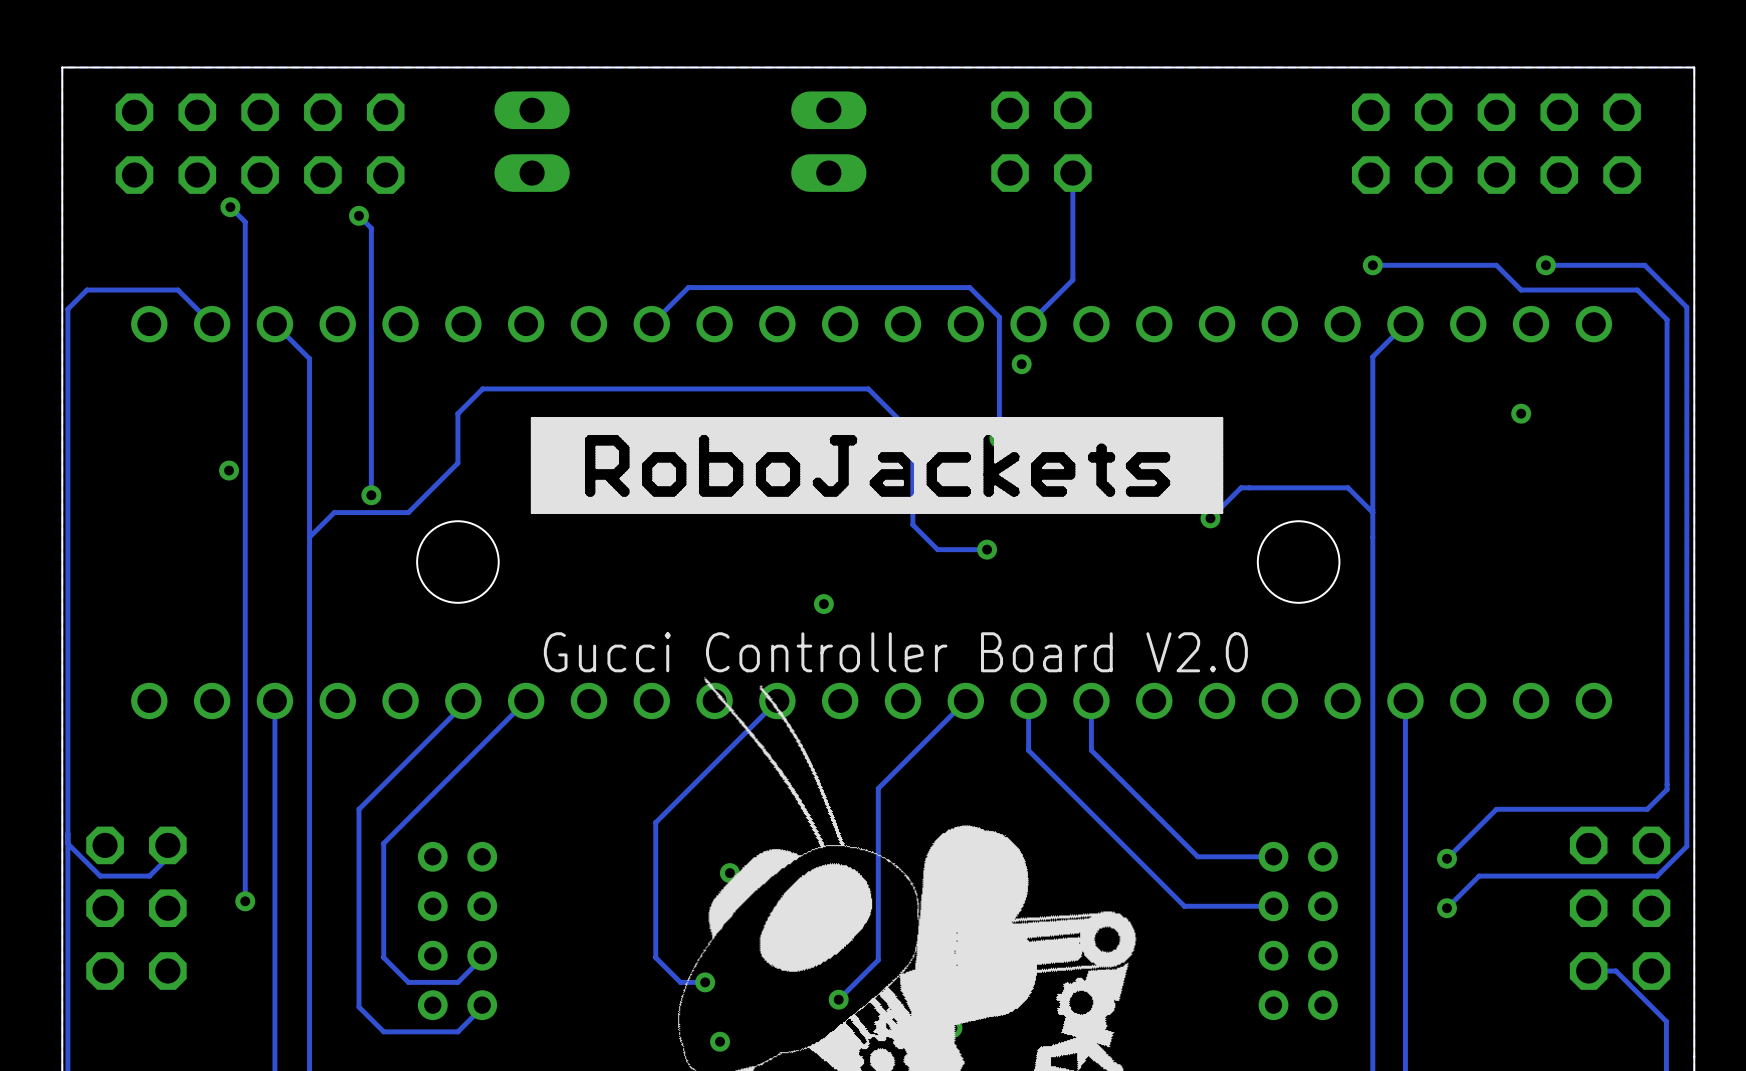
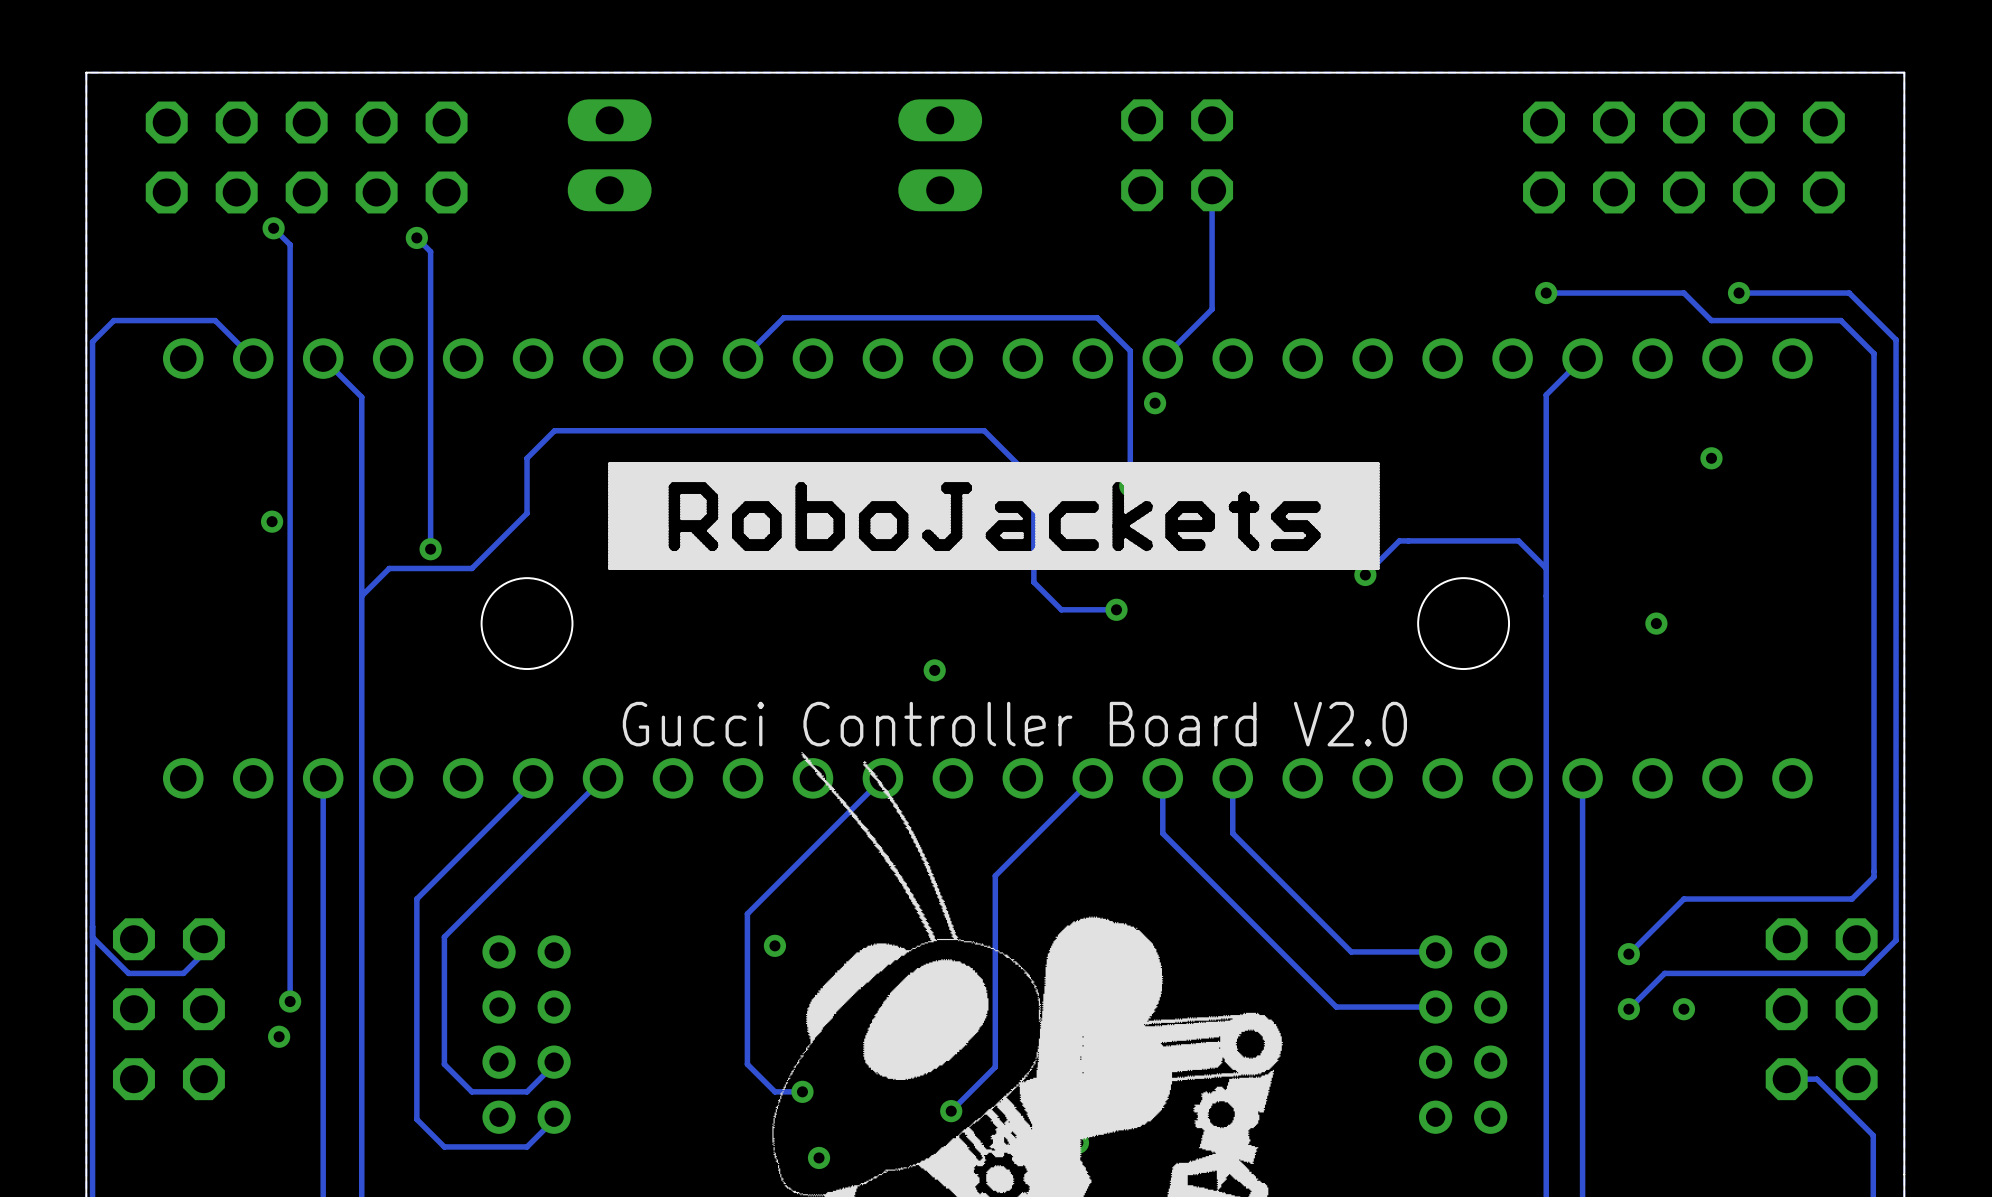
via: none -> (1656, 623)
via position: (729, 873) -> (774, 945)
via: none -> (1683, 1009)
via: none -> (279, 1036)

